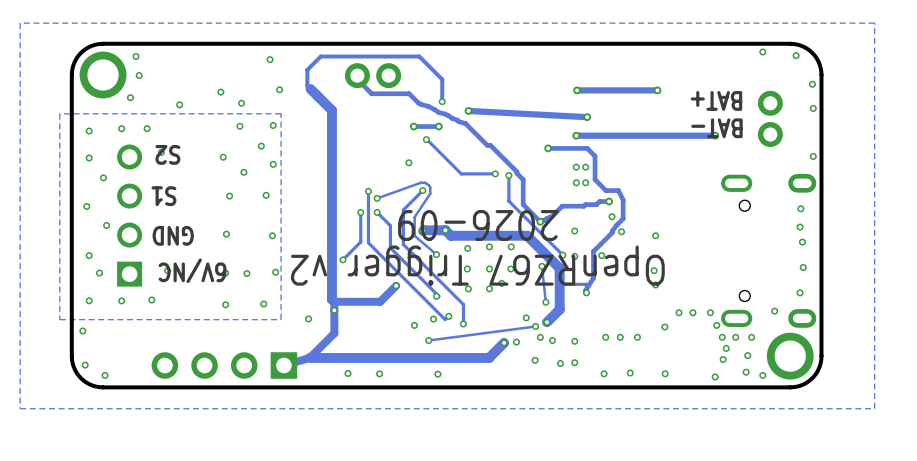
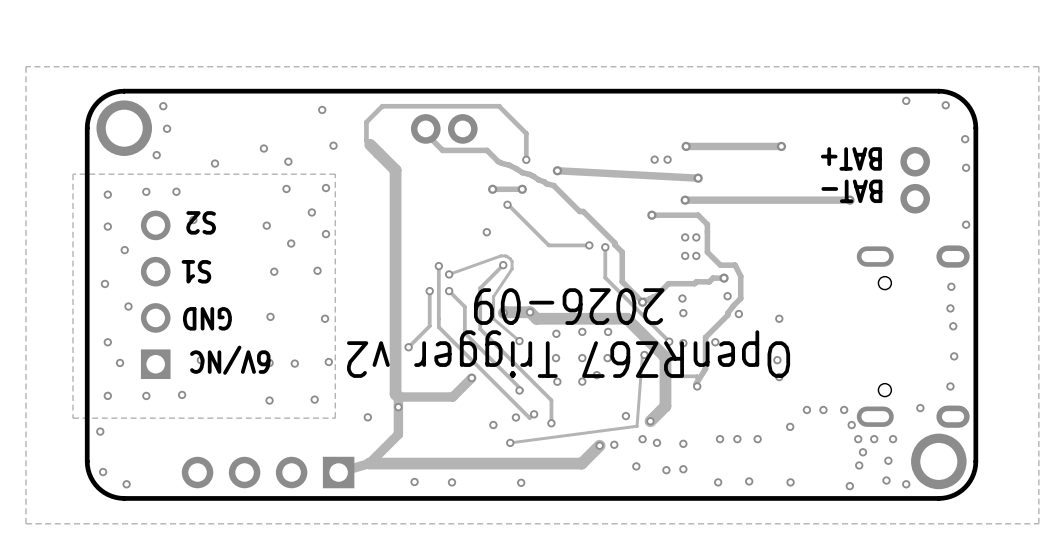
via: none -> (654, 159)
via: none -> (667, 159)
via: none -> (682, 298)
track: none -> (642, 353) (637, 426)
track: (541, 266) (545, 302) -> none
via: (545, 302) -> none
via: (535, 326) -> none

